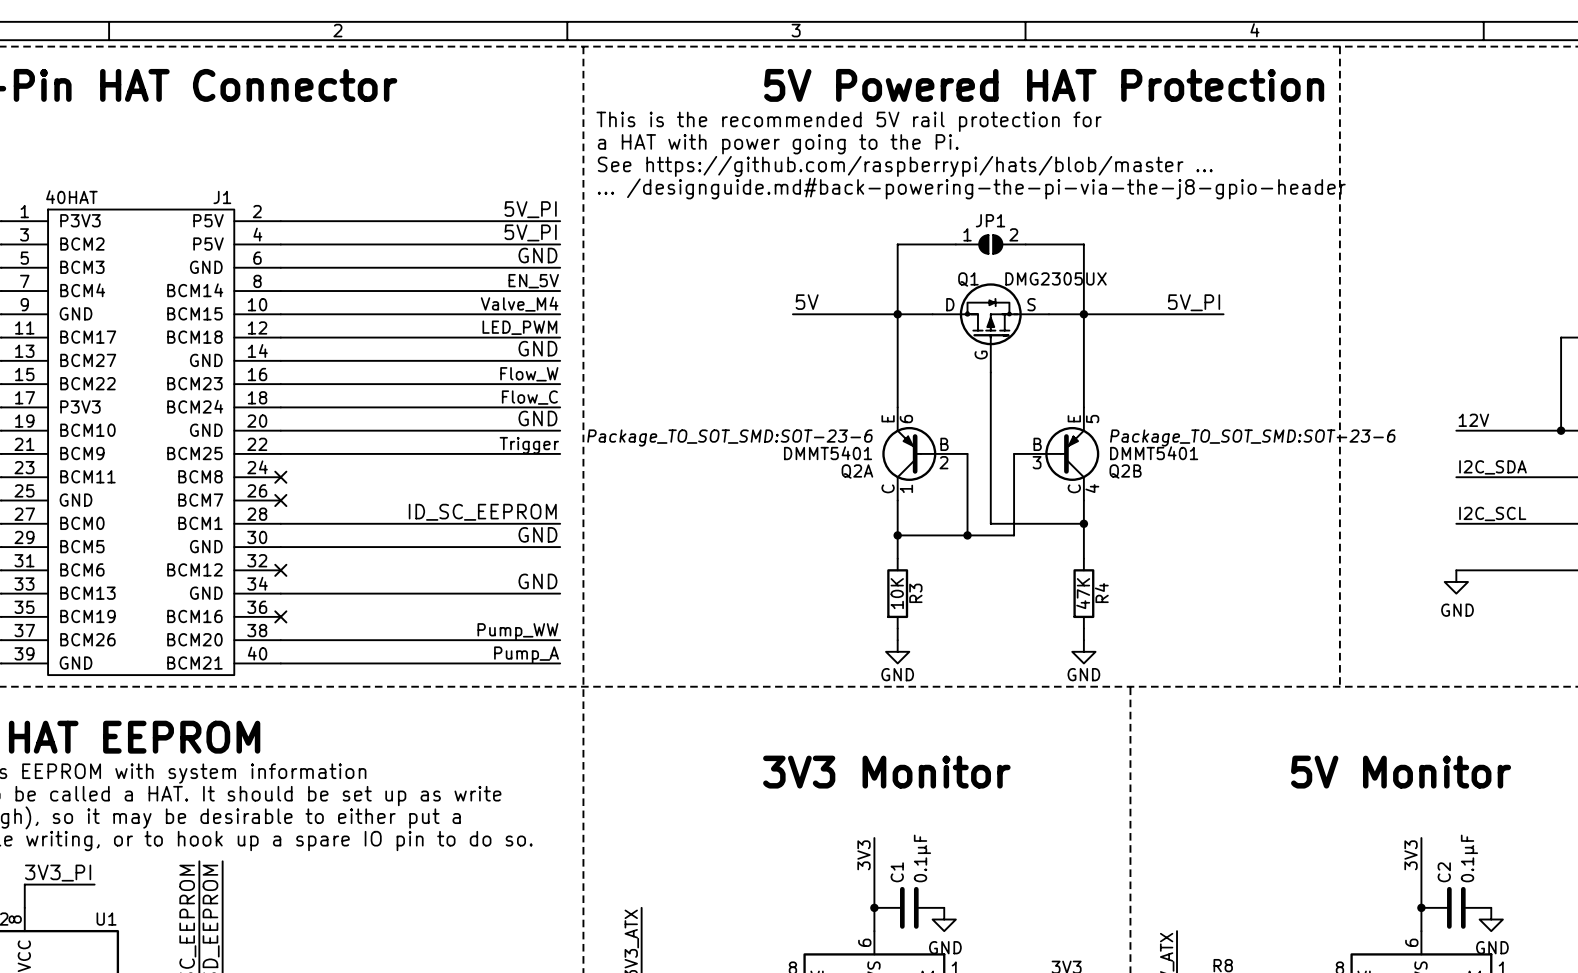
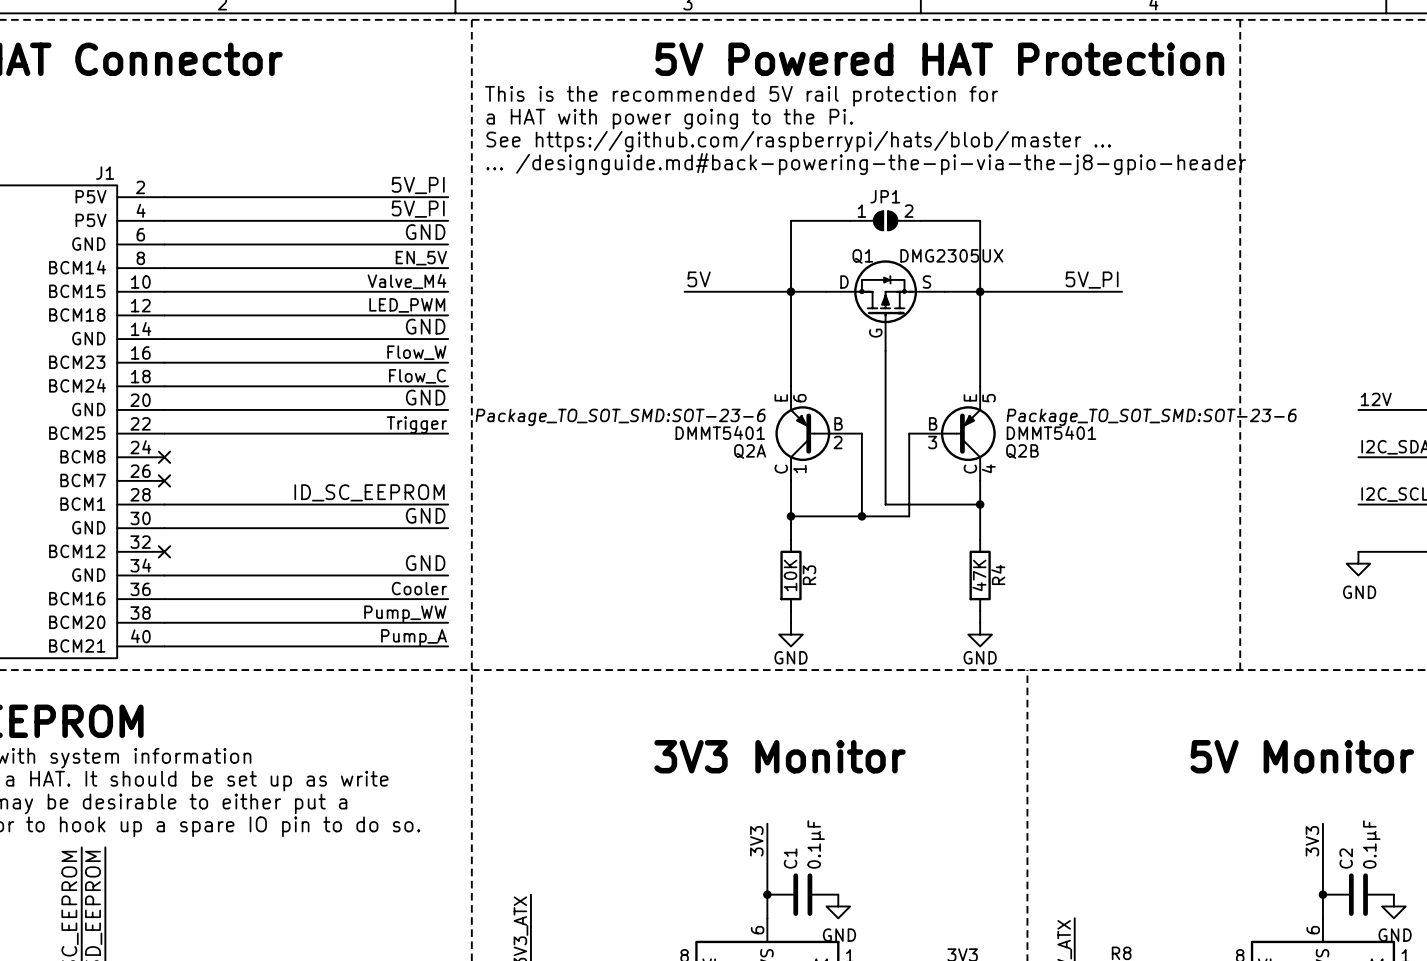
label: none -> Cooler (419, 588)
wire: none -> (164, 599) (448, 599)
no-connect mark: (280, 616) -> none

